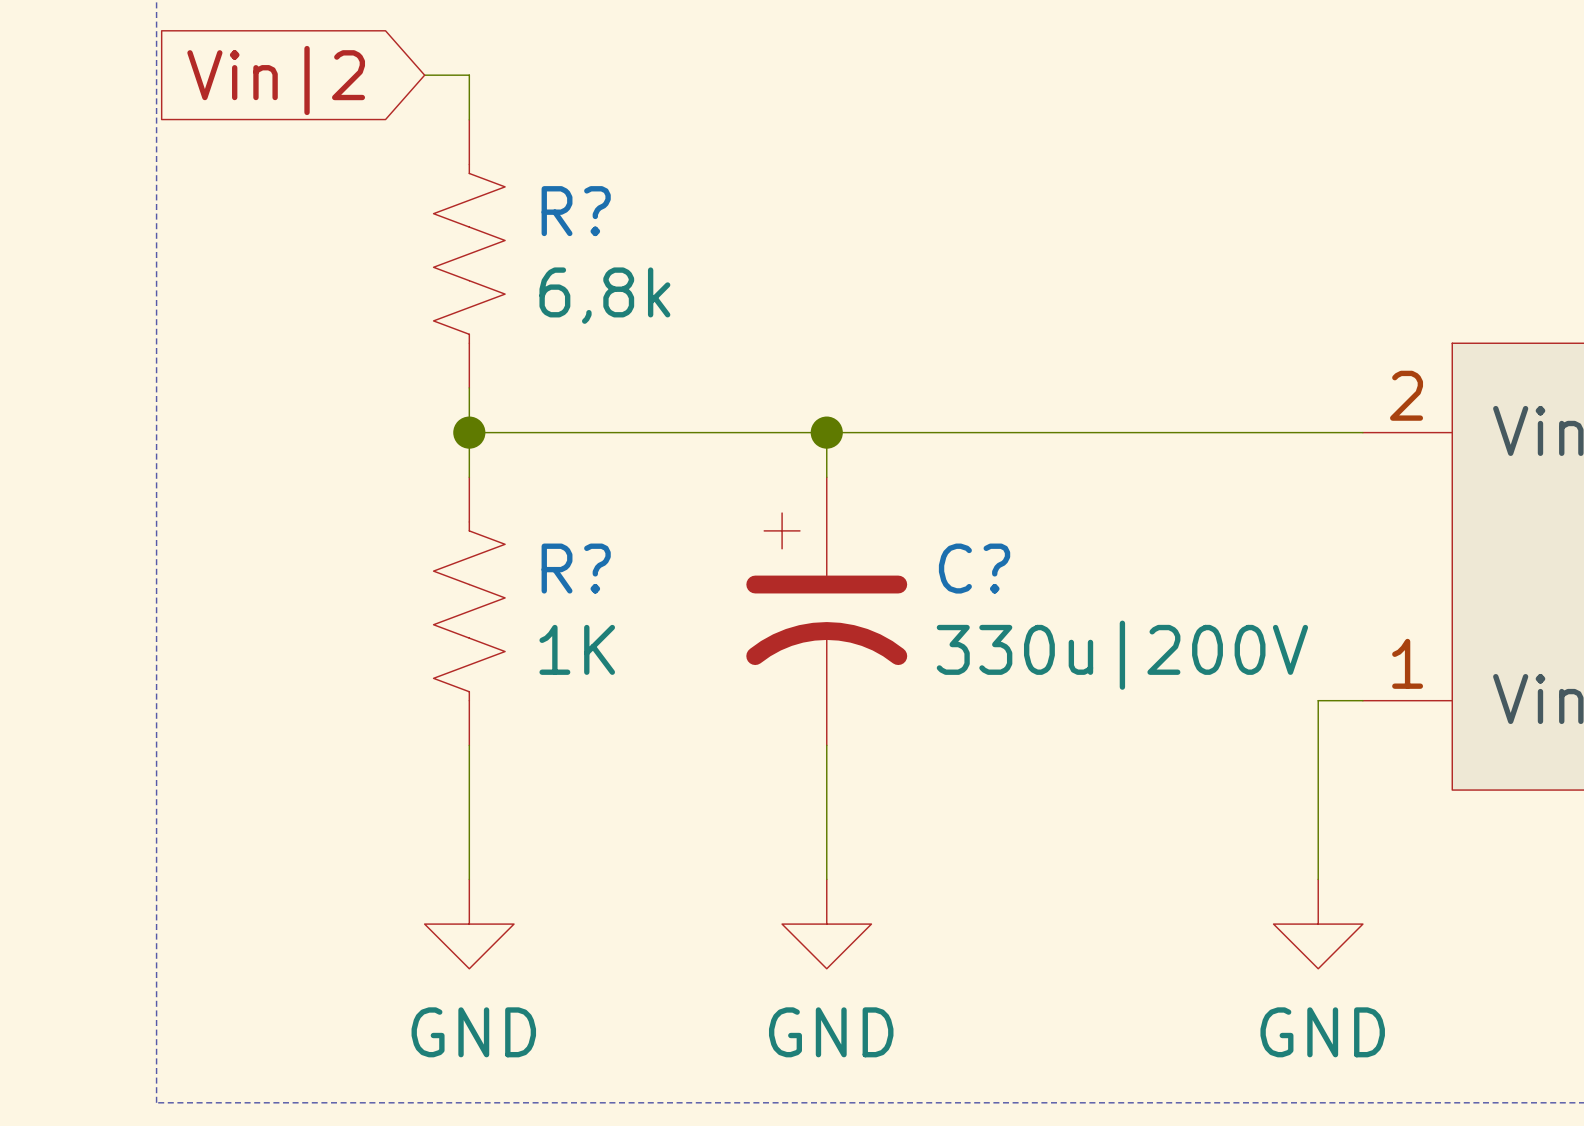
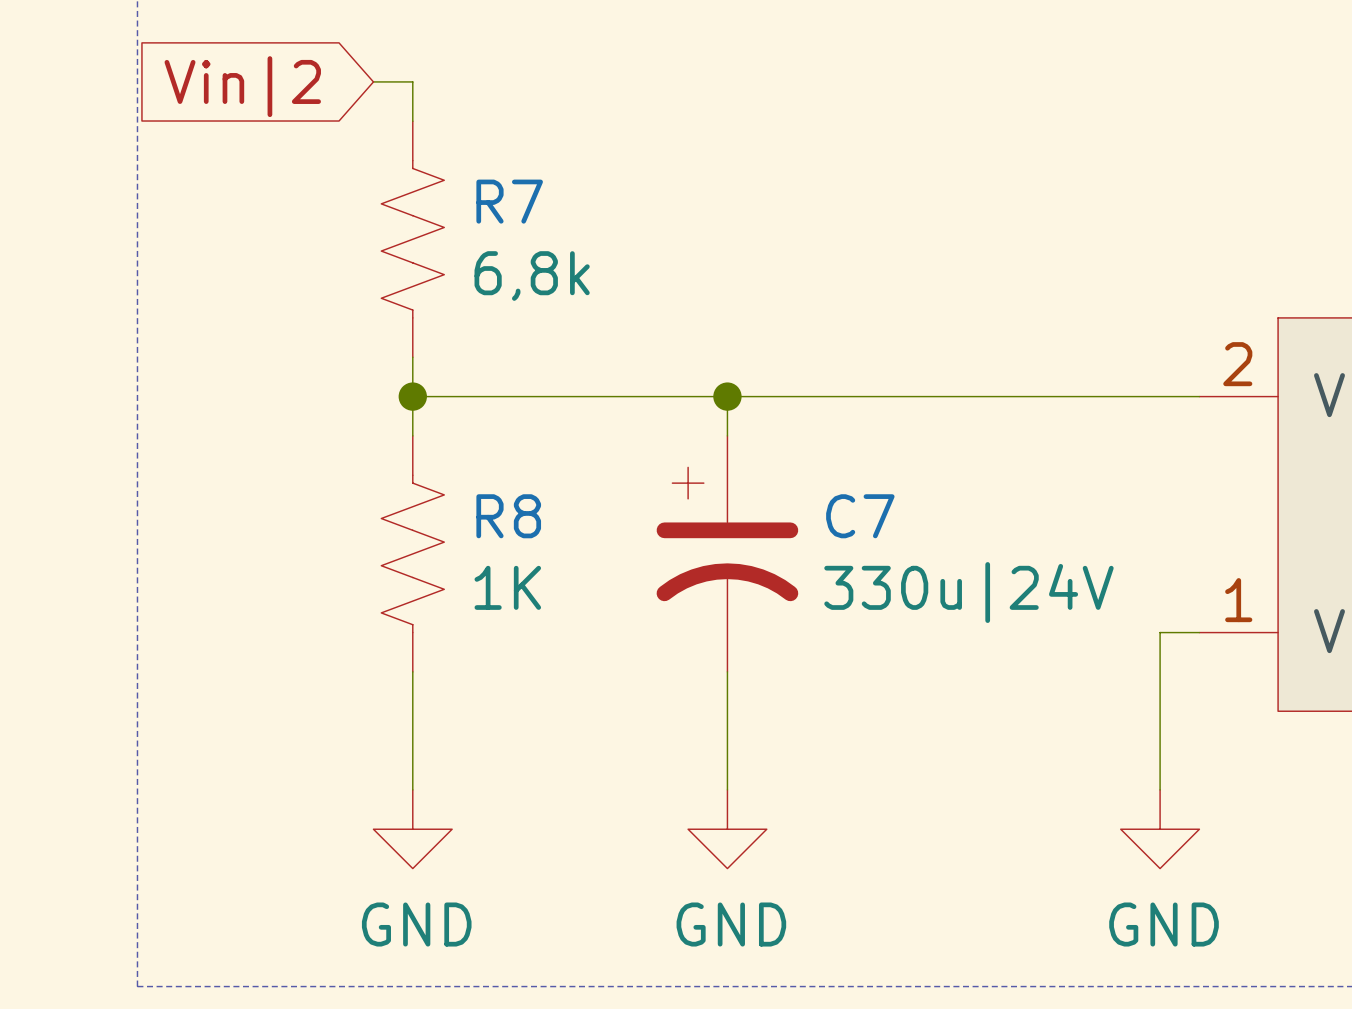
R? name: R? (576, 211) -> R7 (509, 201)
R? name: R? (576, 568) -> R8 (508, 516)
C? name: C? (974, 568) -> C7 (860, 516)
C? value: 330u|200V (1122, 655) -> 330u|24V (968, 592)

